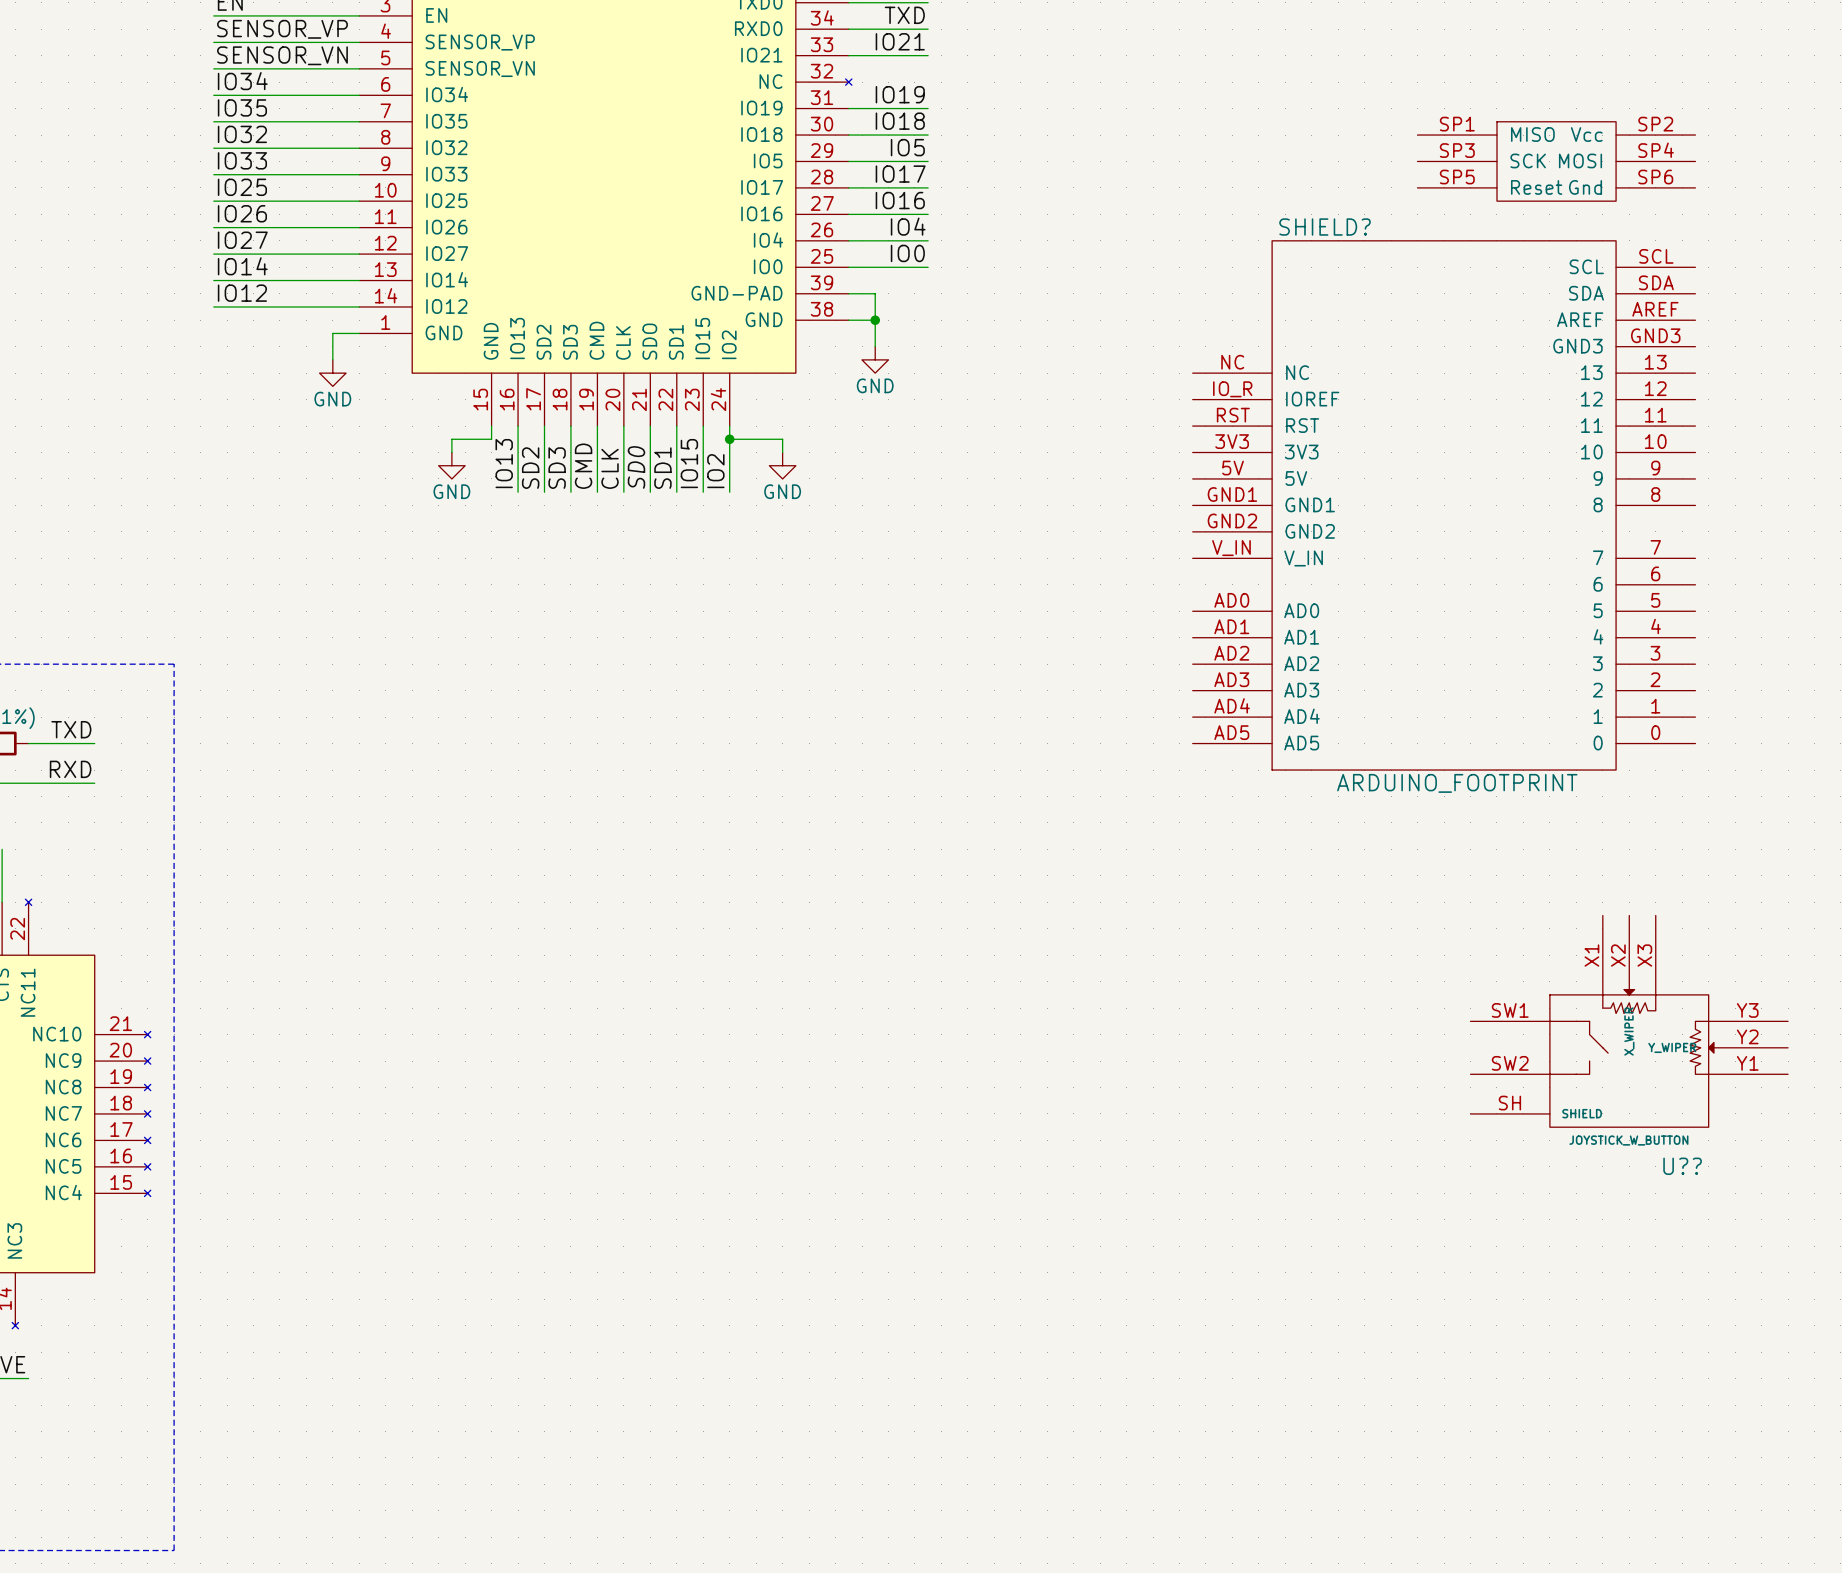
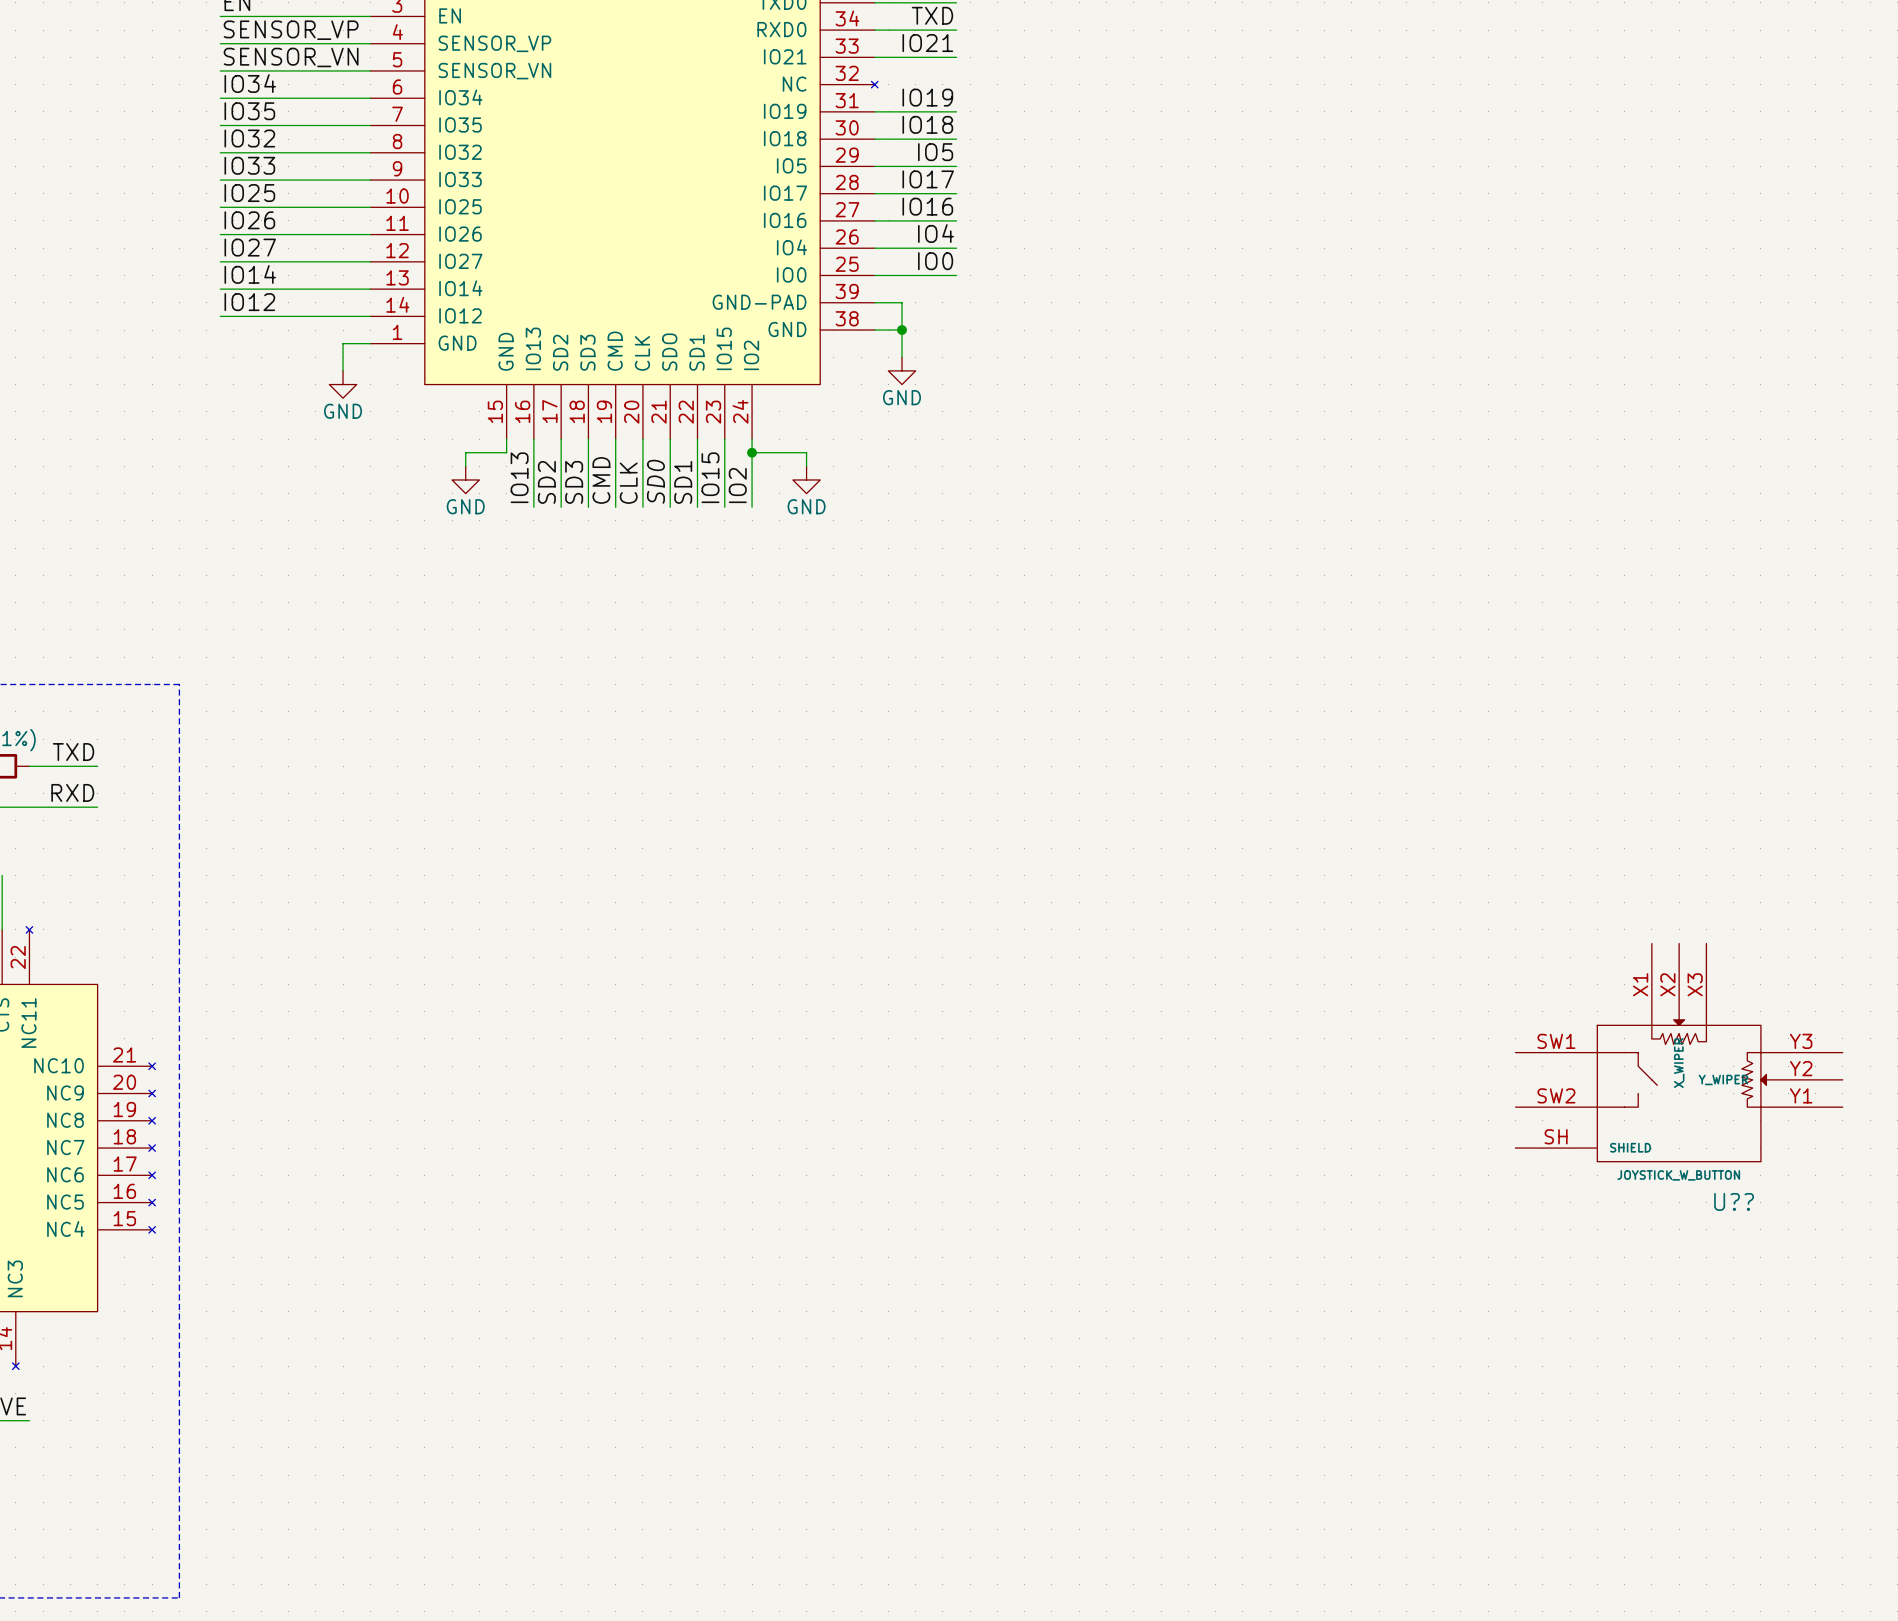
SHIELD?: ARDUINO_FOOTPRINT (1444, 445) -> none

